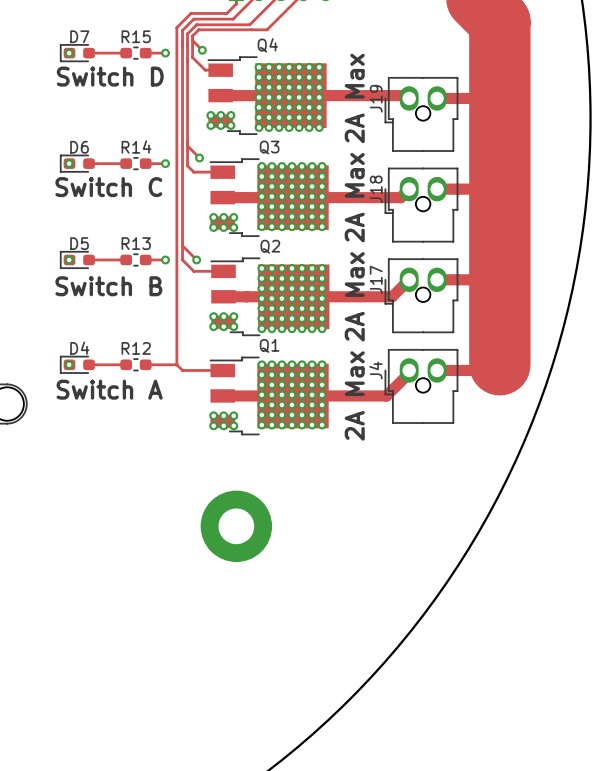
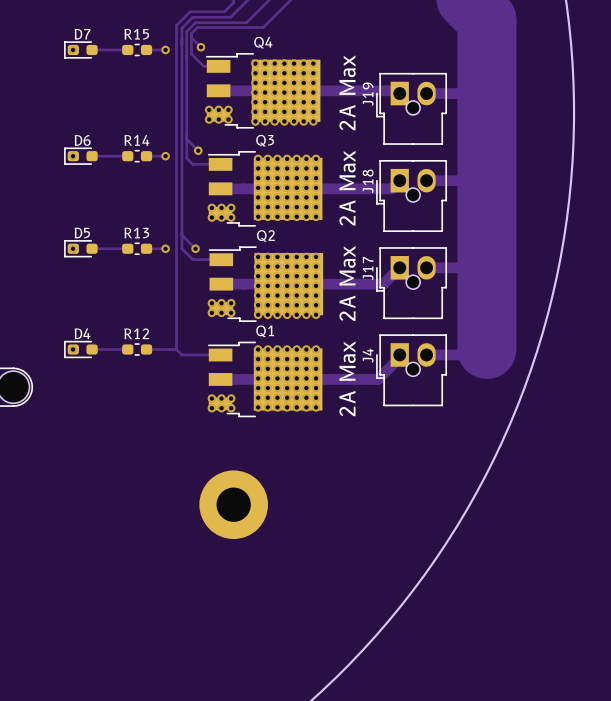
text: Switch D (110, 76) -> none
J19 footprint: [384, 77, 459, 152] -> [376, 73, 447, 145]
J18 footprint: [384, 167, 459, 243] -> [376, 160, 447, 232]
text: Switch C (108, 187) -> none
J17 footprint: [384, 258, 459, 334] -> [376, 247, 447, 319]
text: Switch B (108, 286) -> none
J4 footprint: [384, 349, 459, 424] -> [376, 334, 447, 407]
text: Switch A (109, 389) -> none

